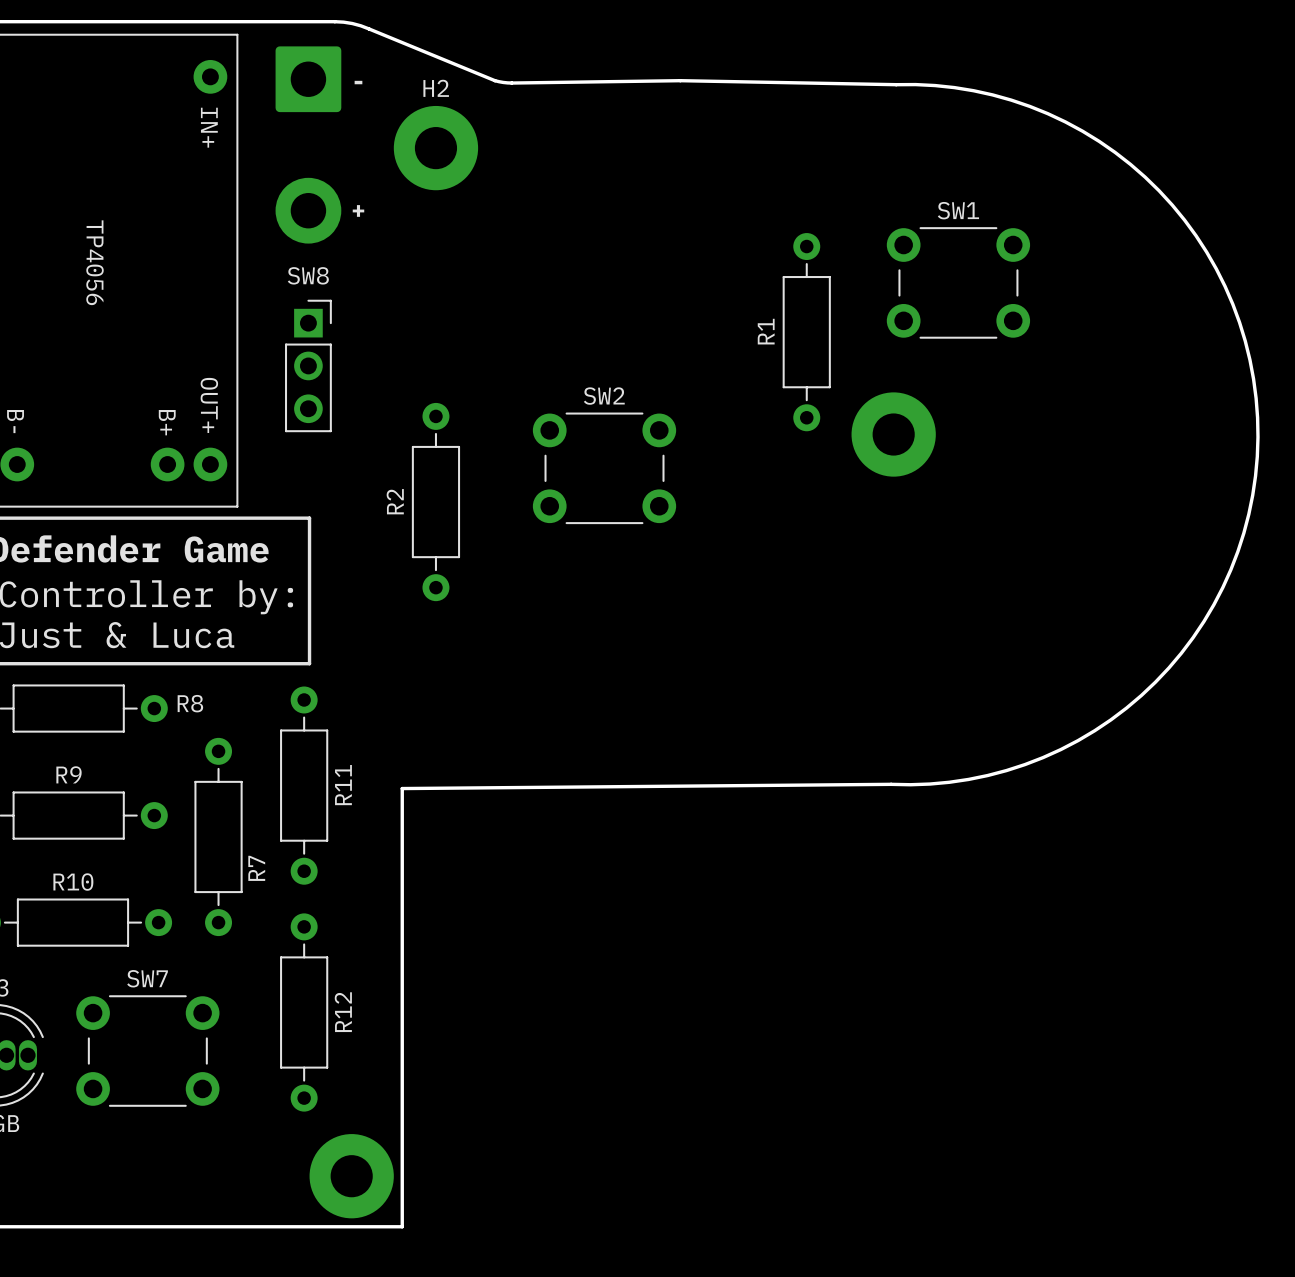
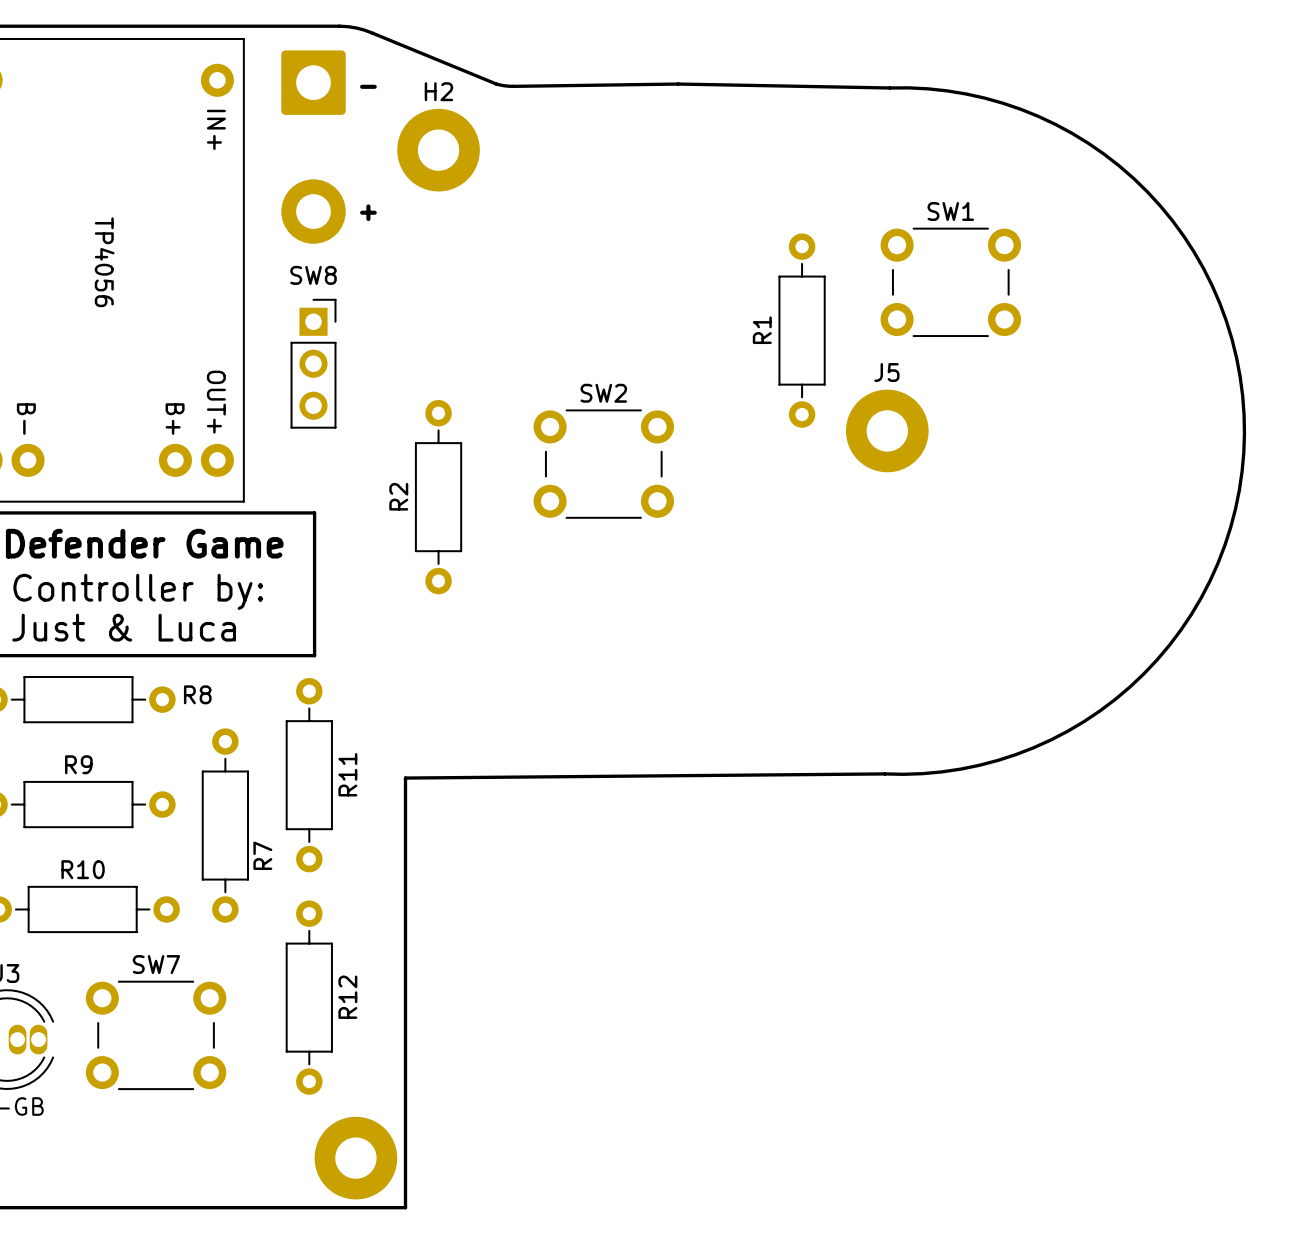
J5 name: none -> J5 (886, 372)

